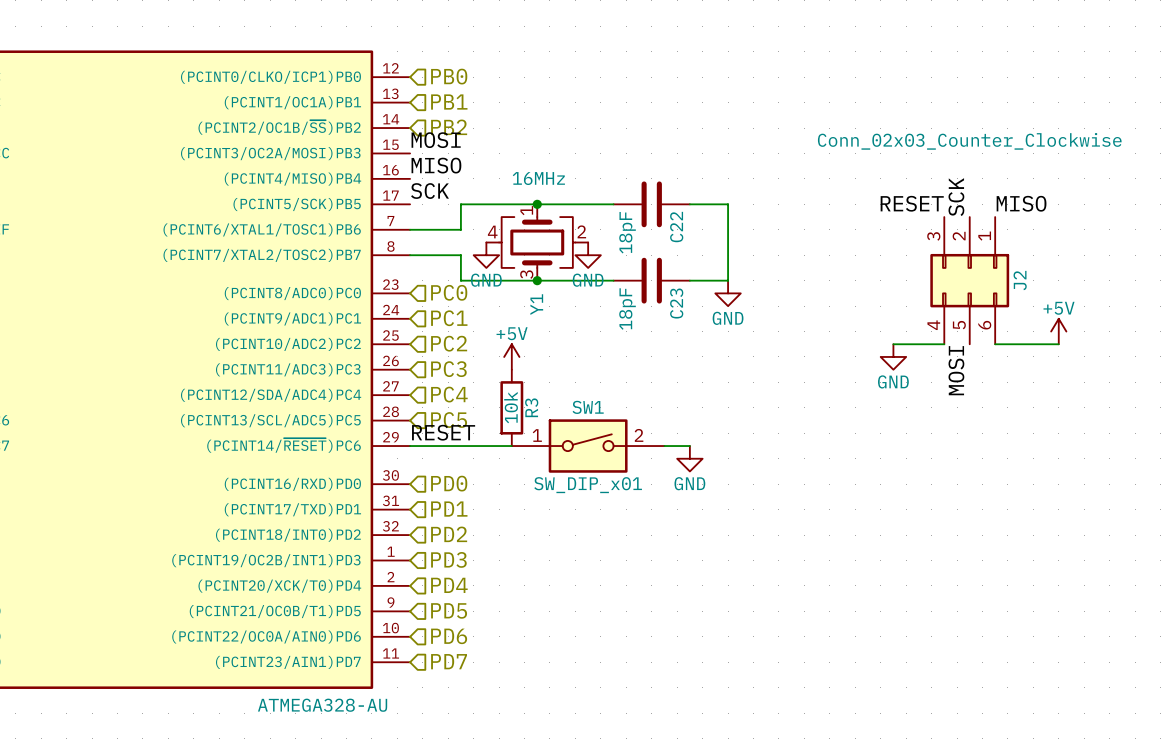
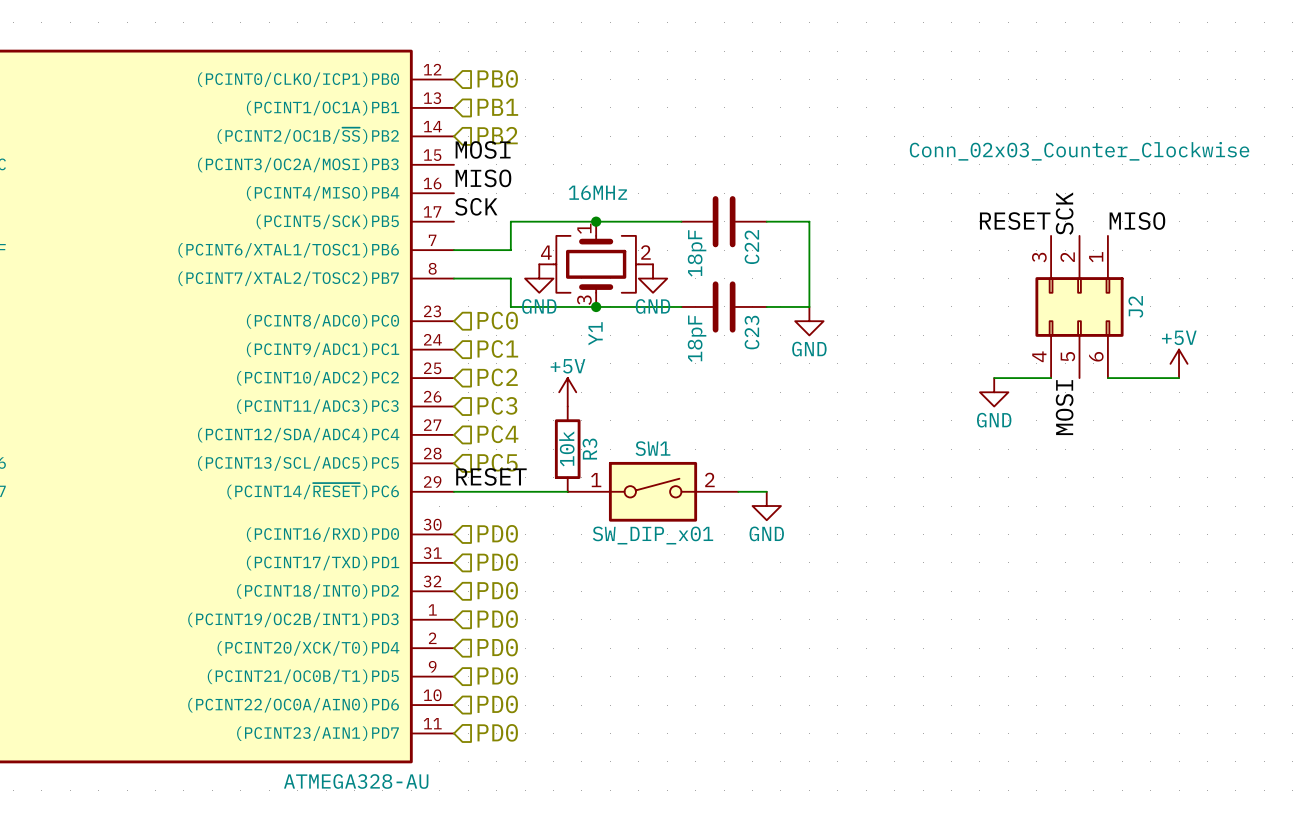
hierarchical label: PD1 (449, 509) -> PD0 (497, 562)
hierarchical label: PD2 (449, 534) -> PD0 (497, 590)
hierarchical label: PD3 (448, 559) -> PD0 (497, 619)
hierarchical label: PD4 (449, 585) -> PD0 (497, 647)
hierarchical label: PD5 (449, 610) -> PD0 (497, 675)
hierarchical label: PD6 (449, 636) -> PD0 (497, 704)
hierarchical label: PD7 (449, 661) -> PD0 (497, 732)

